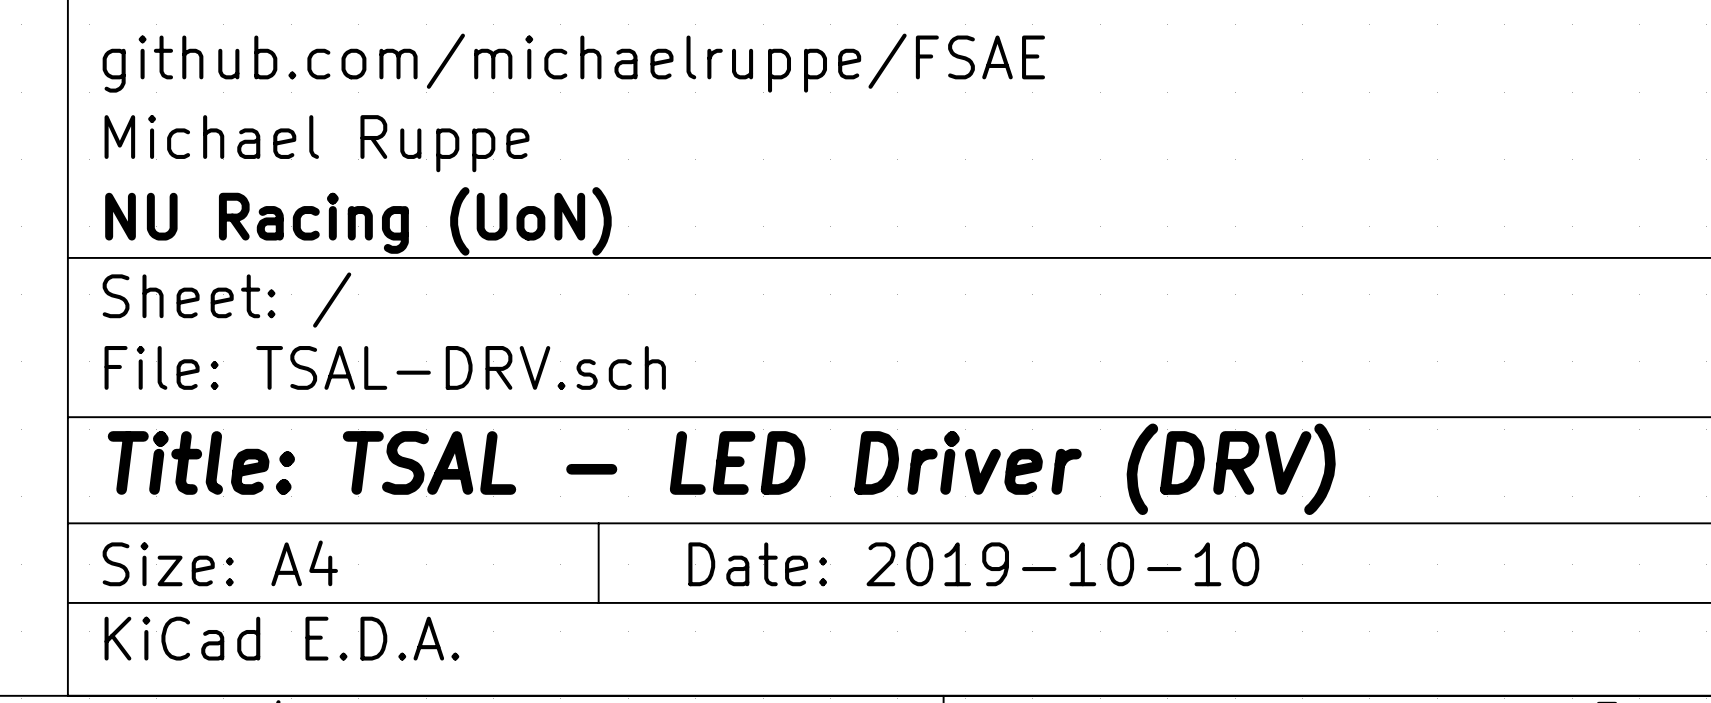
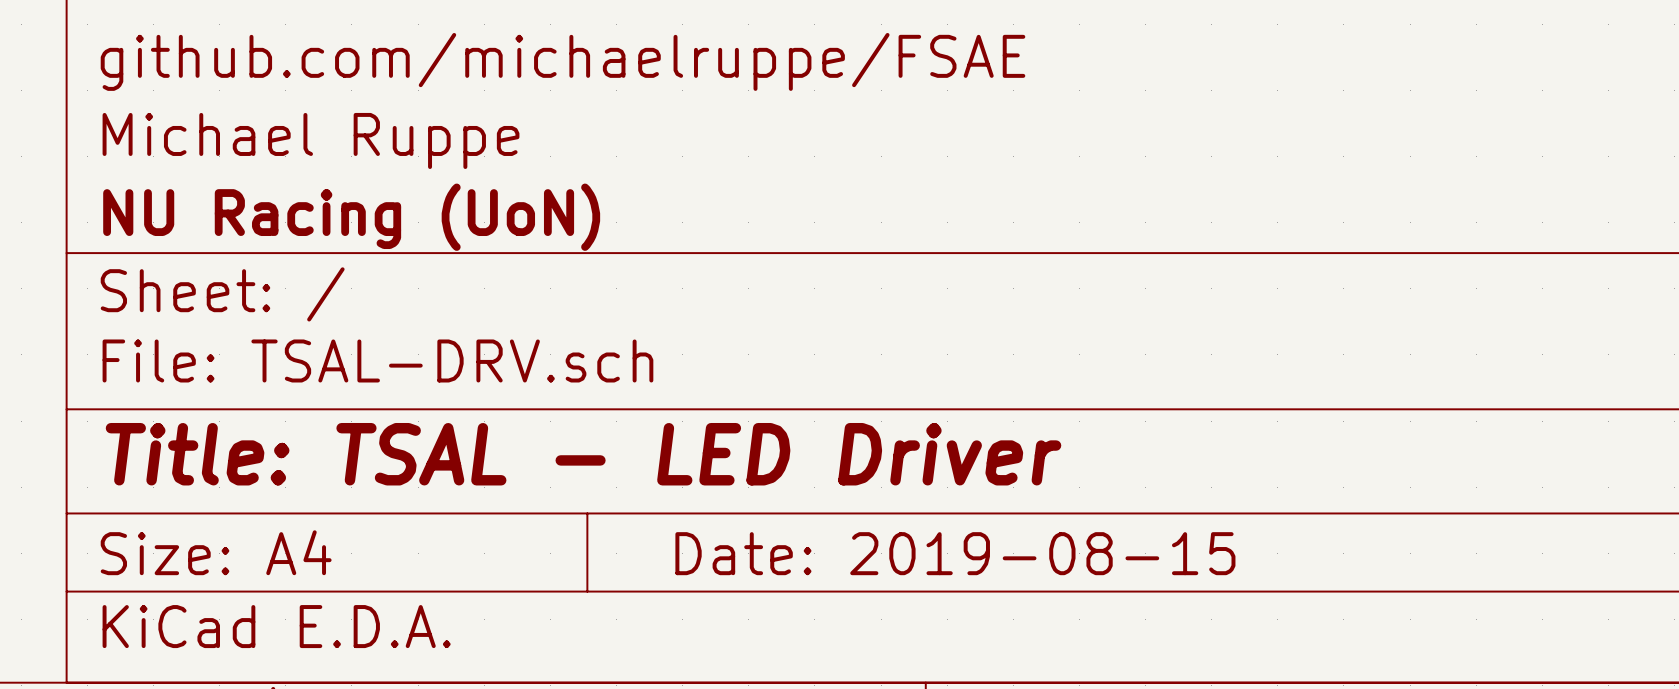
title block: Title: TSAL - LED Driver (DRV) (721, 469) -> Title: TSAL - LED Driver (583, 454)
title block: Date: 2019-10-10 (973, 564) -> Date: 2019-08-15 (955, 553)

